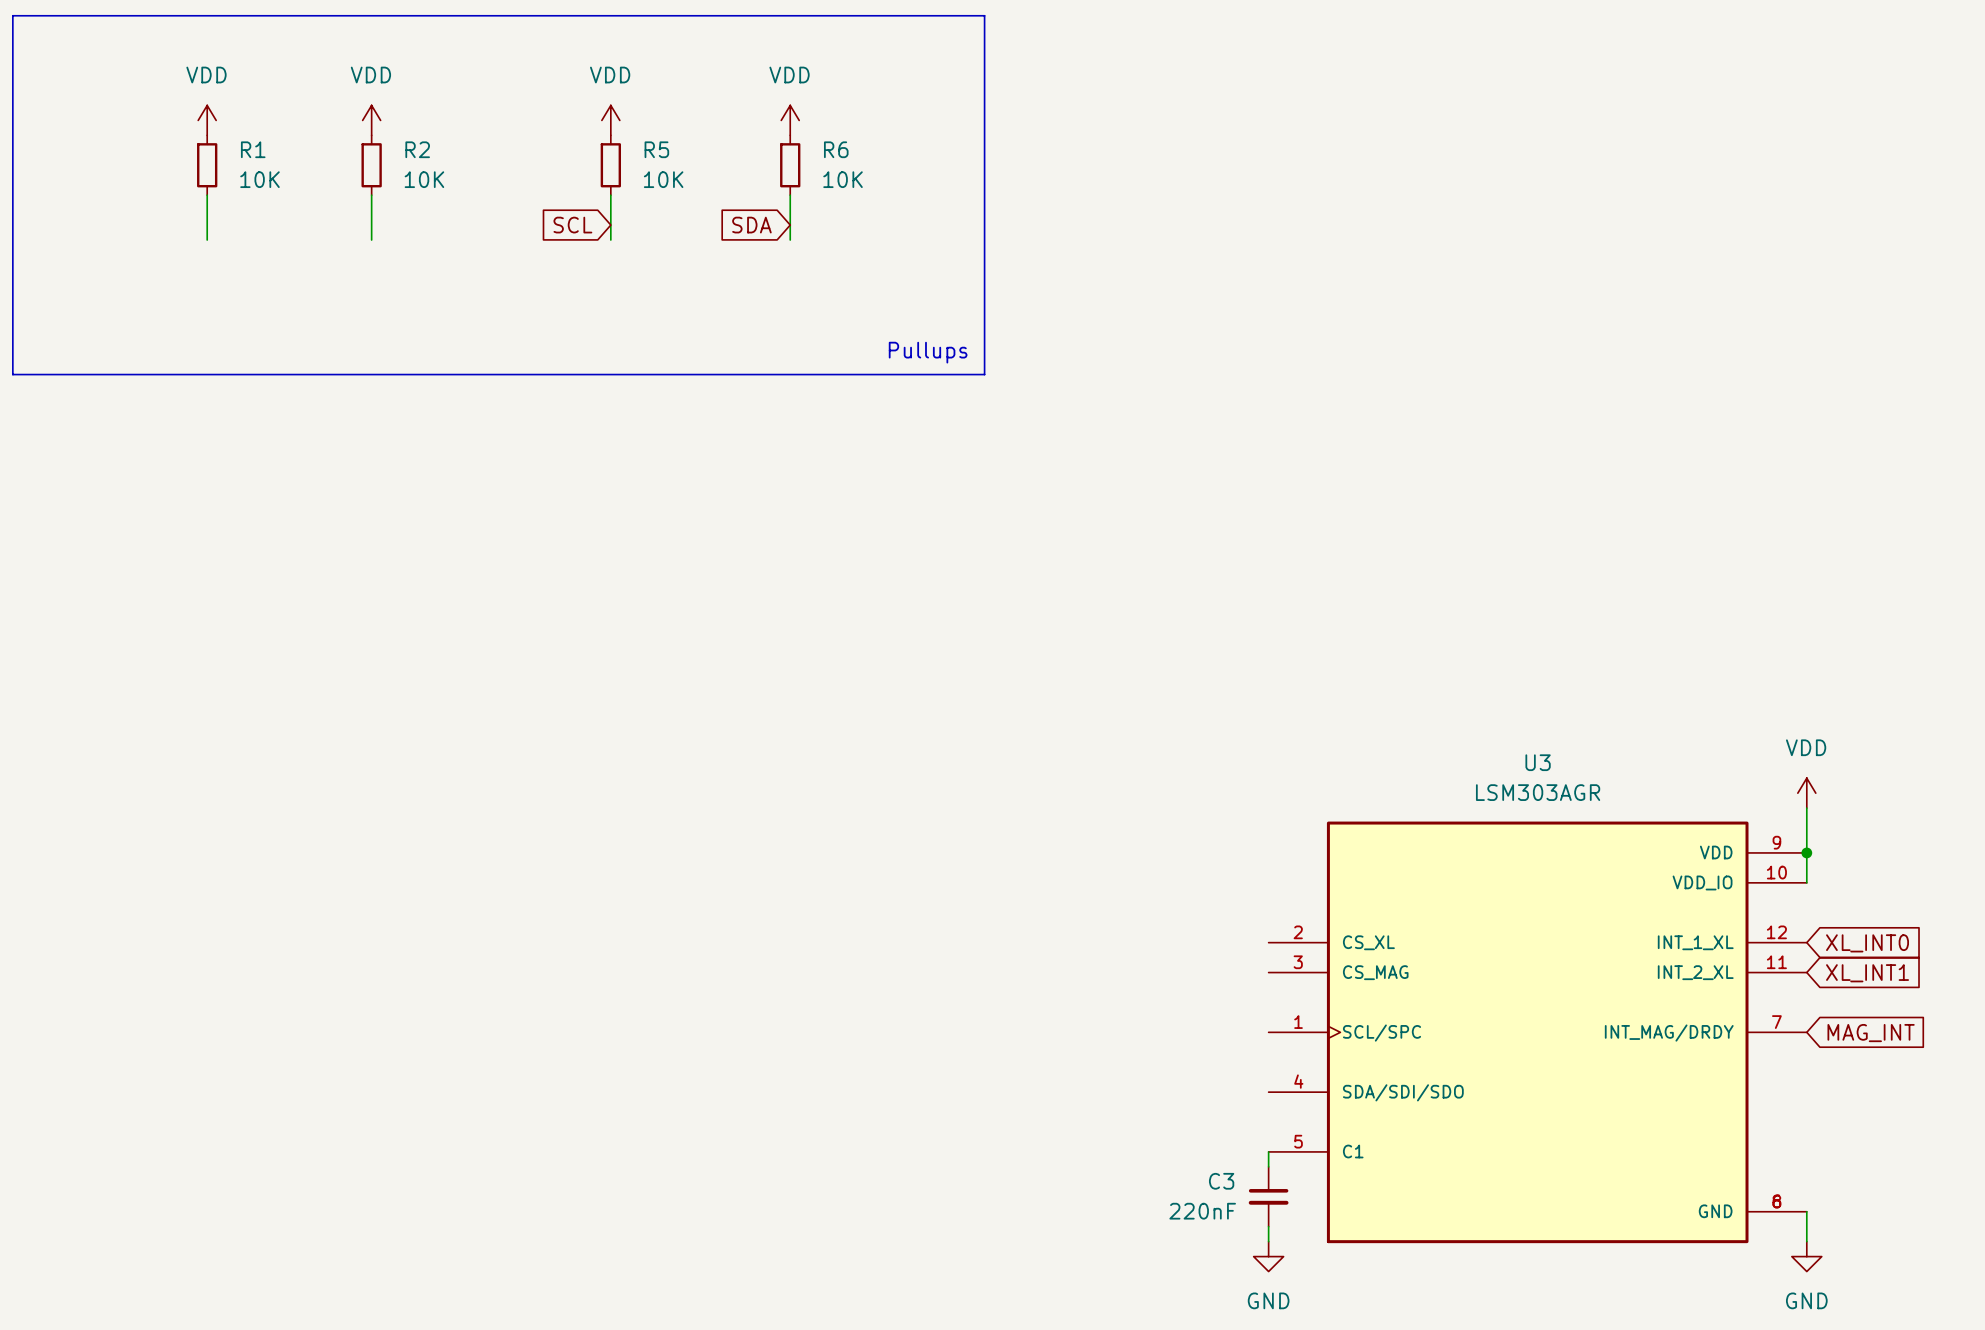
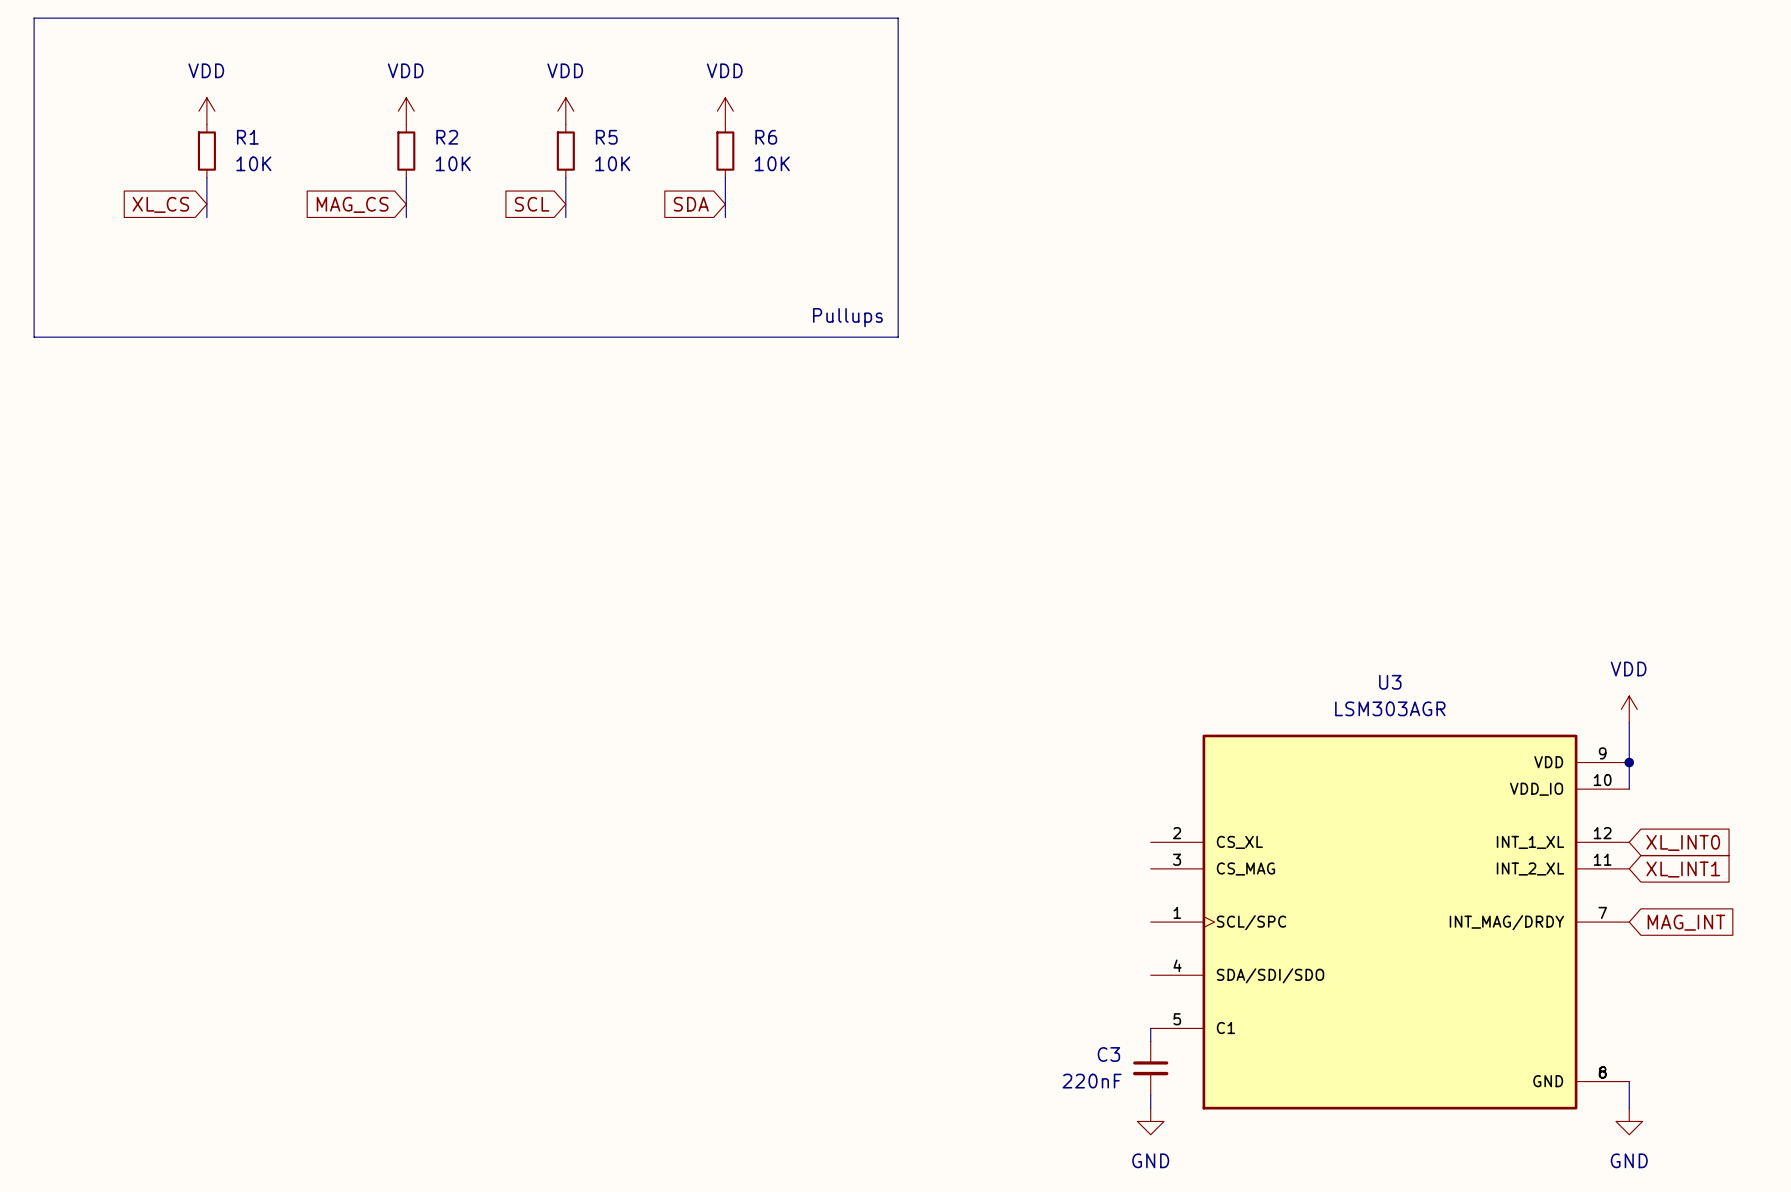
power symbol position: VDD (371, 120) -> VDD (406, 111)
R2 position: (371, 165) -> (406, 151)
wire: (371, 195) (371, 240) -> (406, 177) (406, 217)
global label: none -> XL_CS (160, 204)
global label: none -> MAG_CS (352, 204)

